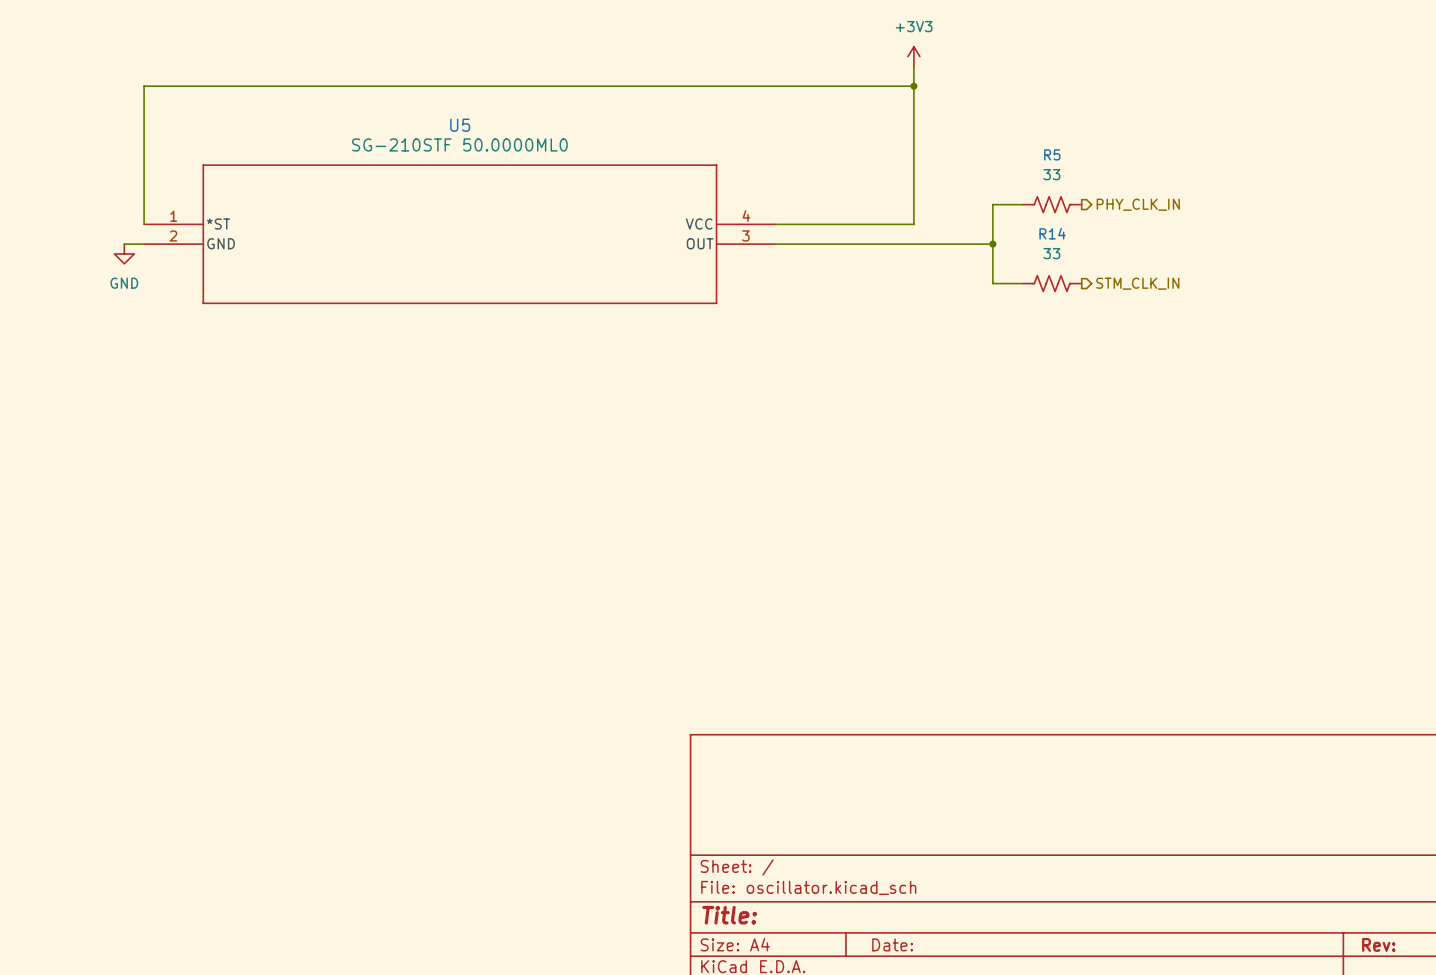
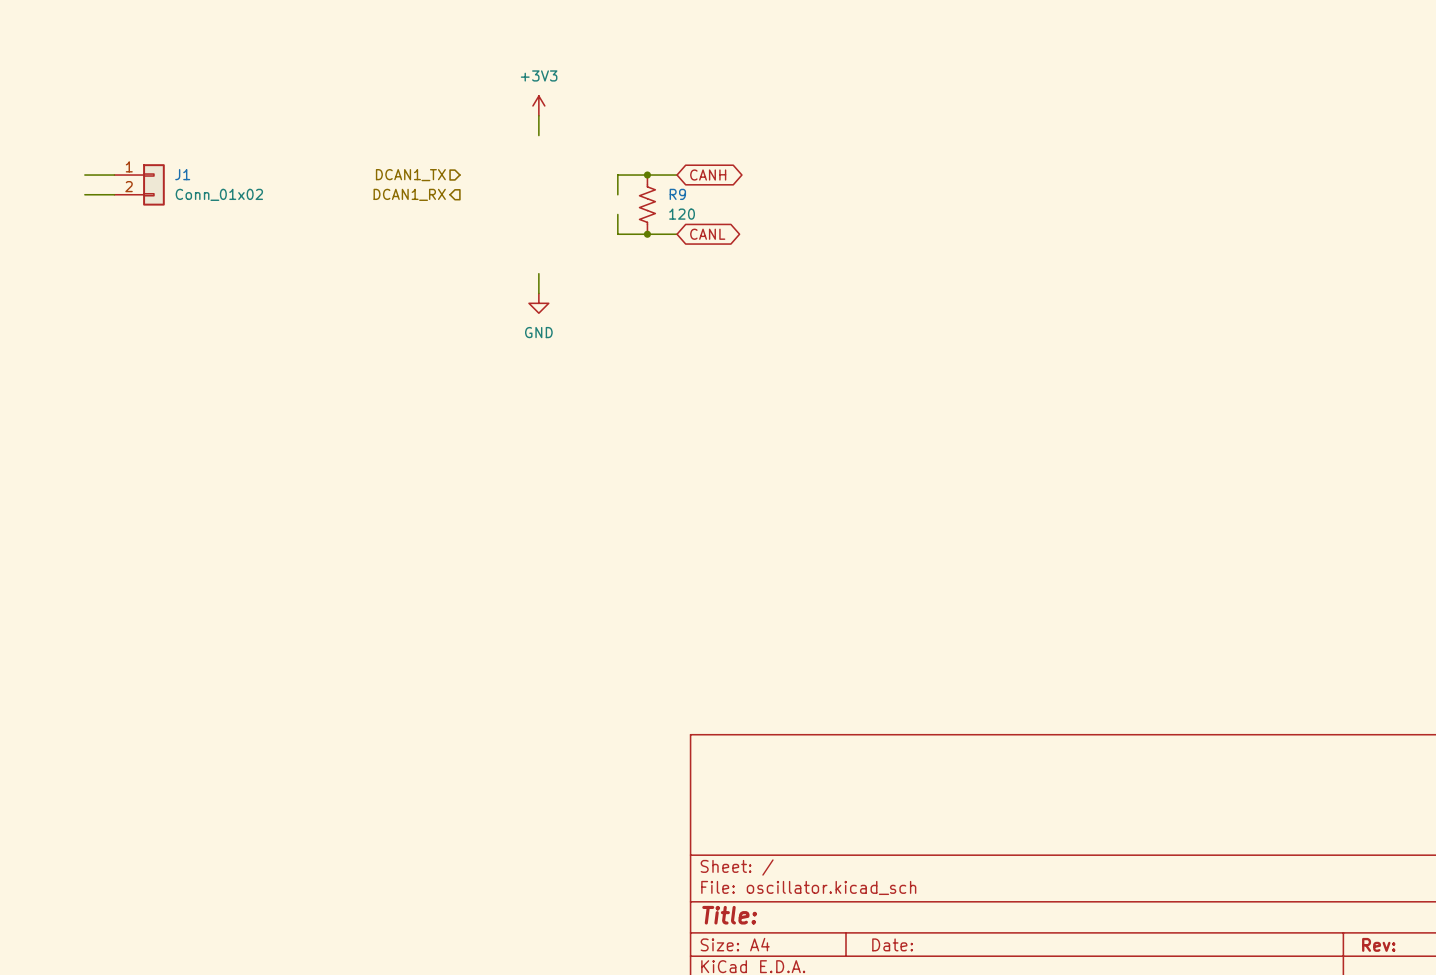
power symbol: +3V3 (913, 56) -> none
wire: (913, 66) (913, 224) (775, 224) -> none
wire: (913, 86) (144, 86) (144, 224) -> none
junction: (913, 86) -> none
power symbol: none -> +3V3 (538, 105)
wire: none -> (538, 115) (538, 135)
wire: none -> (84, 175) (114, 175)
hierarchical label: none -> DCAN1_TX (410, 175)
junction: none -> (647, 175)
wire: none -> (677, 175) (617, 175) (617, 194)
global label: none -> CANH (708, 175)
J1: none -> Conn_01x02 (139, 184)
wire: none -> (84, 194) (114, 194)
hierarchical label: none -> DCAN1_RX (409, 194)
R9: none -> 120 (647, 204)
wire: (1022, 204) (992, 204) (992, 283) (1022, 283) -> none
R5: 33 (1052, 204) -> none
hierarchical label: PHY_CLK_IN (1138, 204) -> none
wire: none -> (617, 214) (617, 234) (677, 234)
U5: SG-210STF 50.0000ML0 (459, 234) -> none
junction: none -> (647, 234)
global label: none -> CANL (707, 234)
wire: (124, 244) (144, 244) -> none
wire: (775, 244) (992, 244) -> none
junction: (992, 244) -> none
power symbol: GND (124, 253) -> none
wire: none -> (538, 273) (538, 293)
R14: 33 (1052, 283) -> none
hierarchical label: STM_CLK_IN (1137, 283) -> none
power symbol: none -> GND (538, 303)

